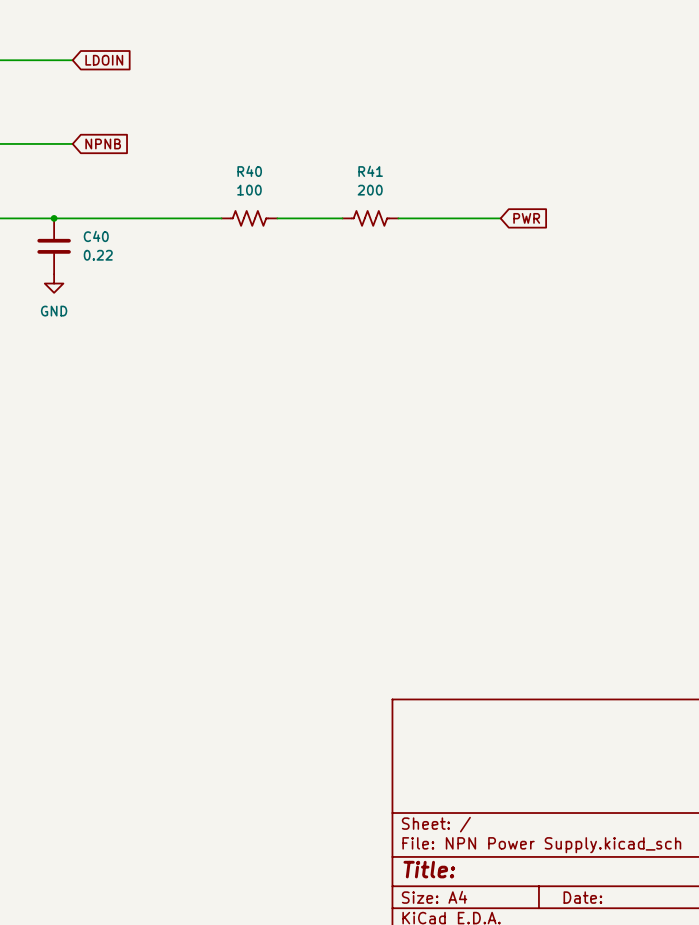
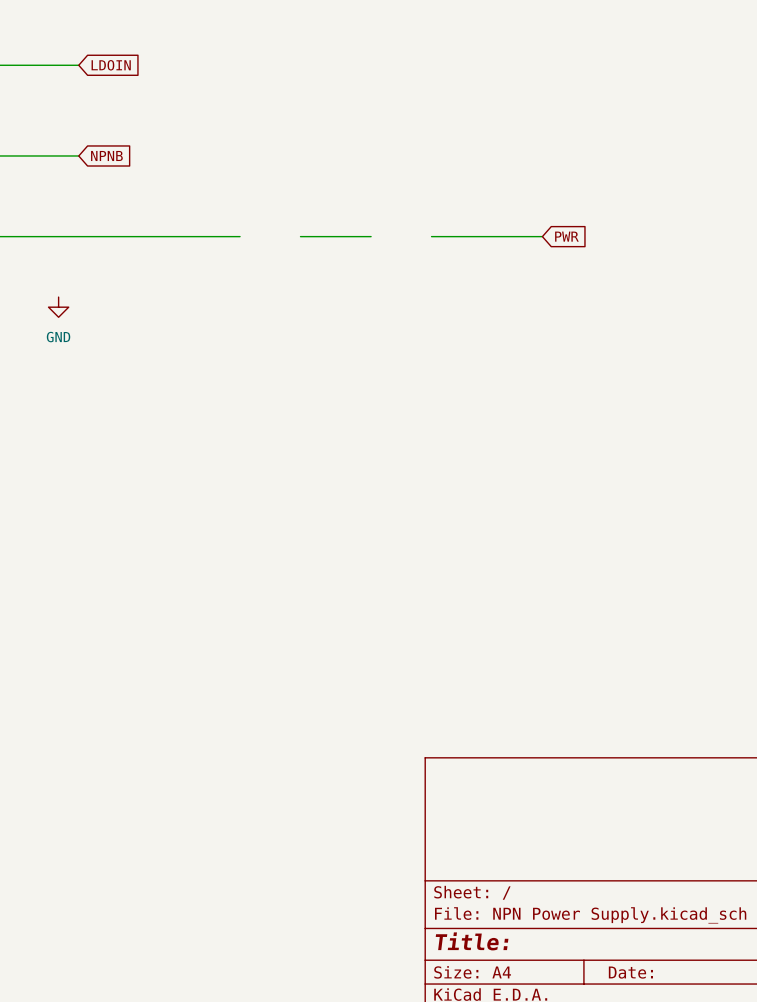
junction: (54, 218) -> none
R40: 100 (249, 218) -> none
R41: 200 (370, 218) -> none
C40: 0.22 (54, 246) -> none

